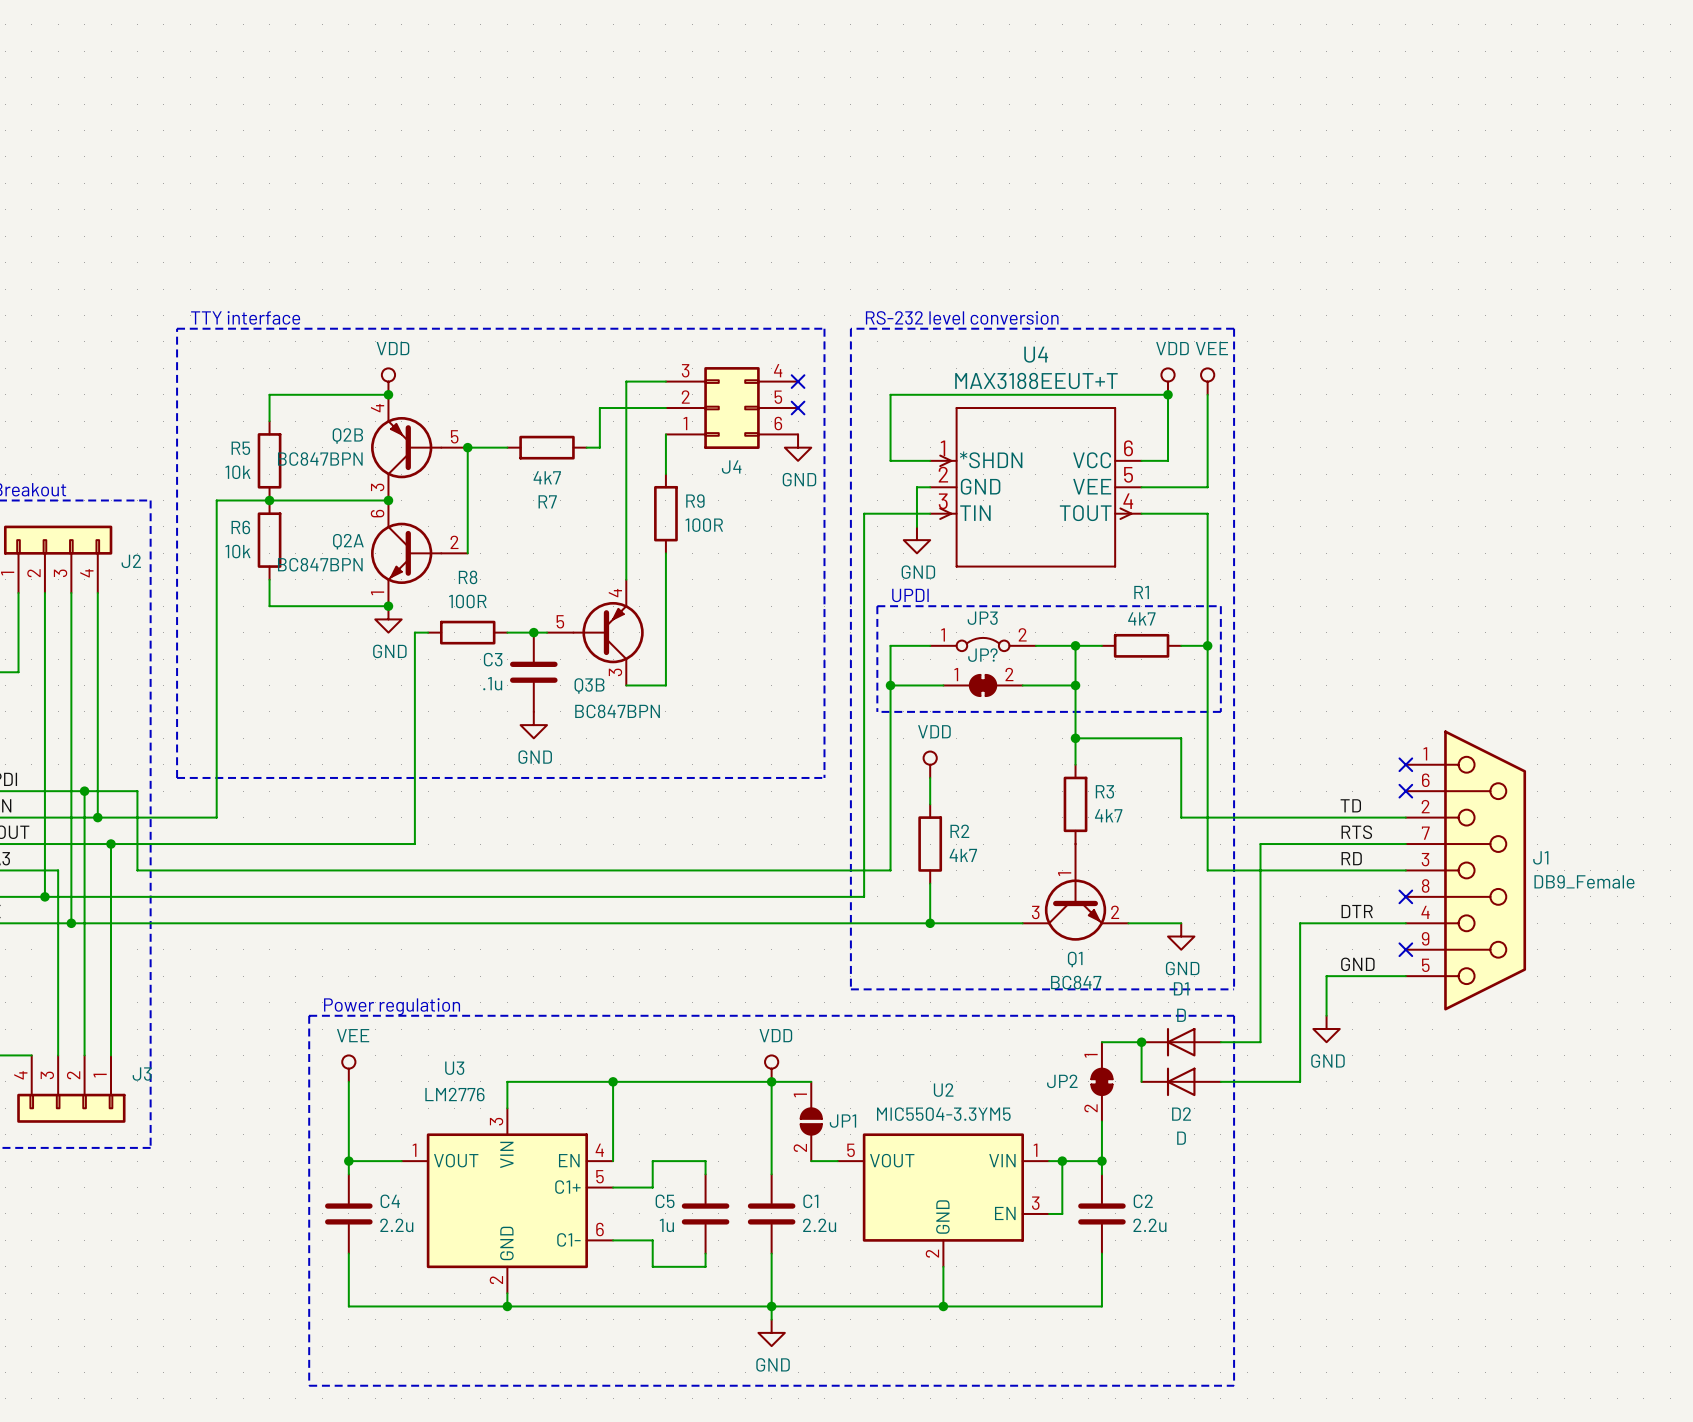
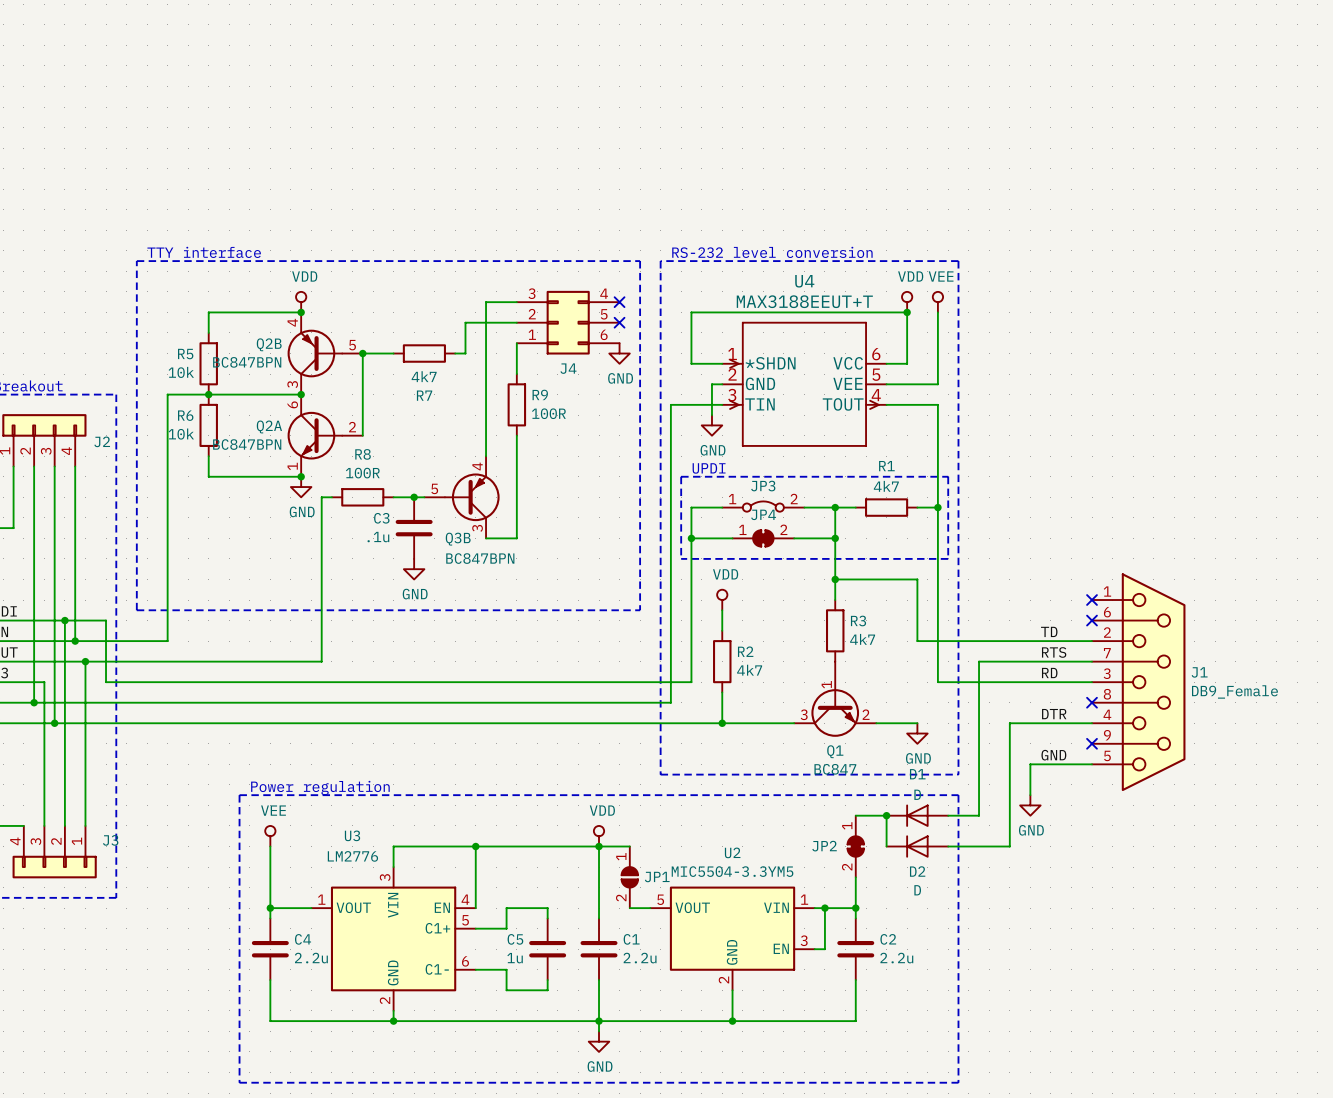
JP? name: JP? (982, 655) -> JP4 (763, 514)

